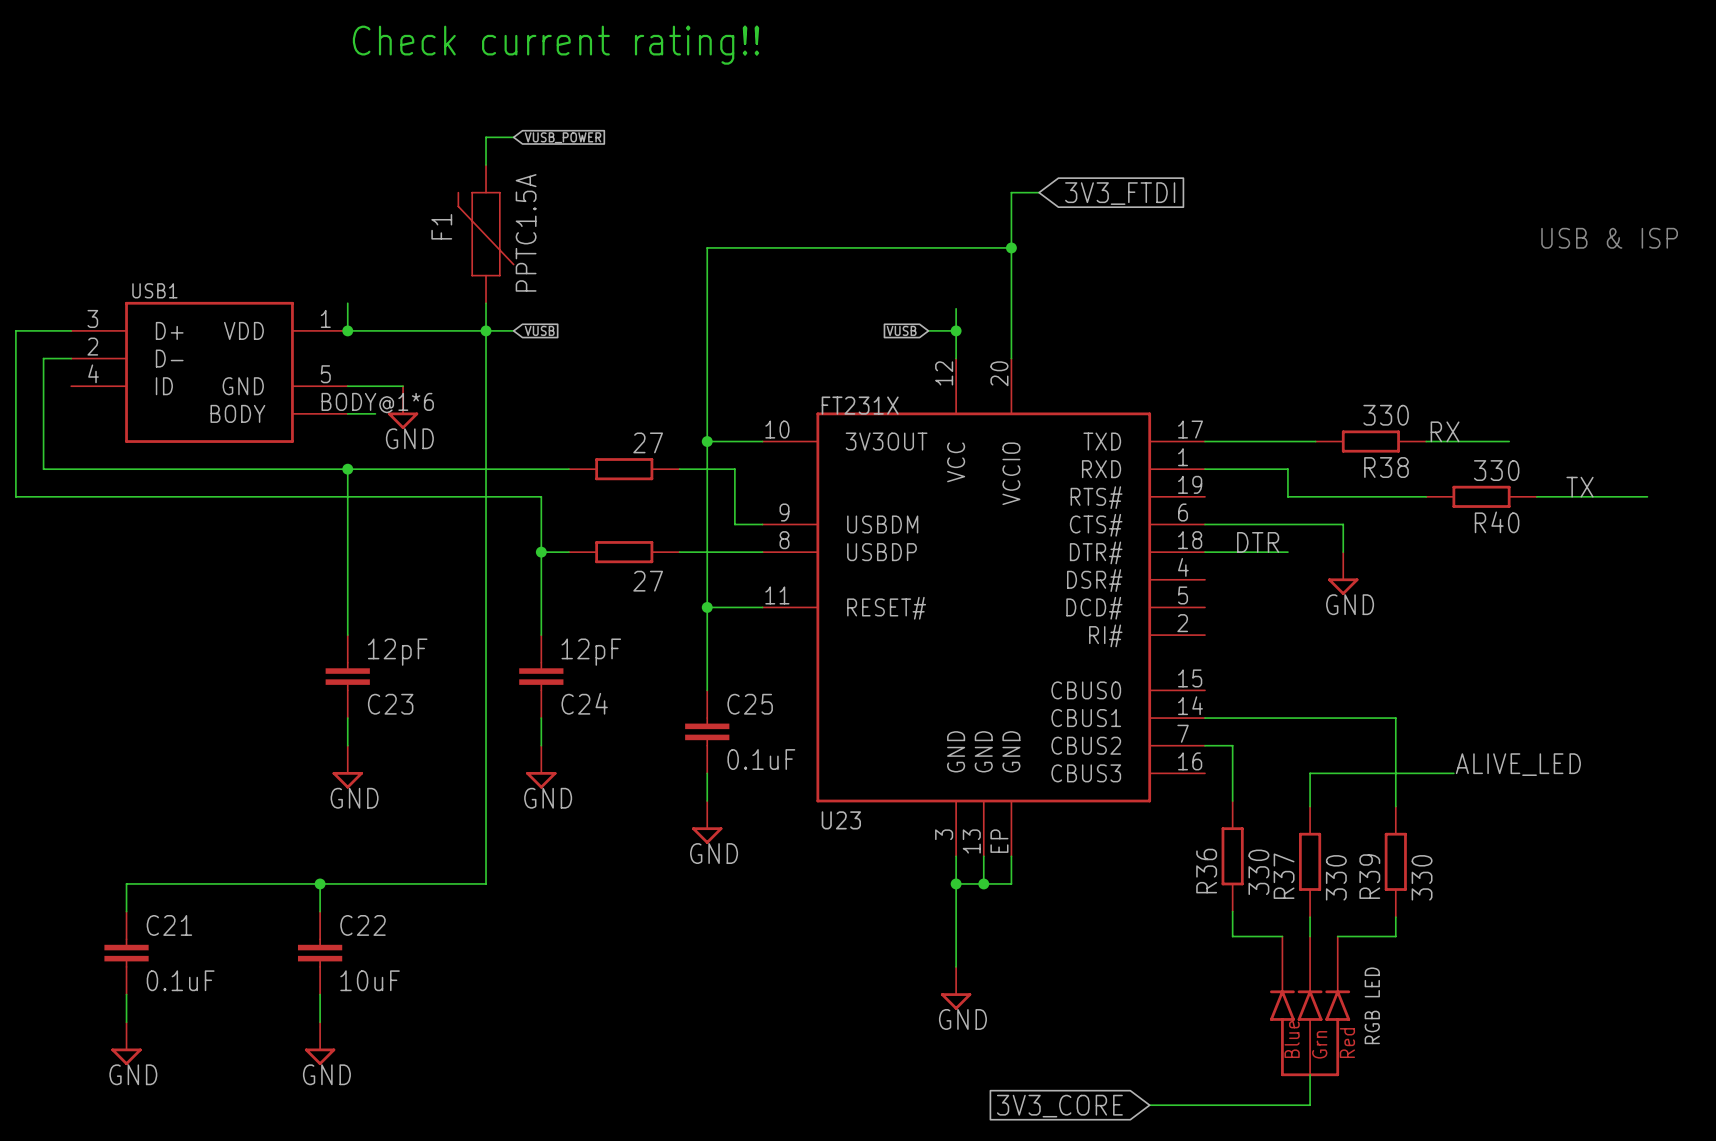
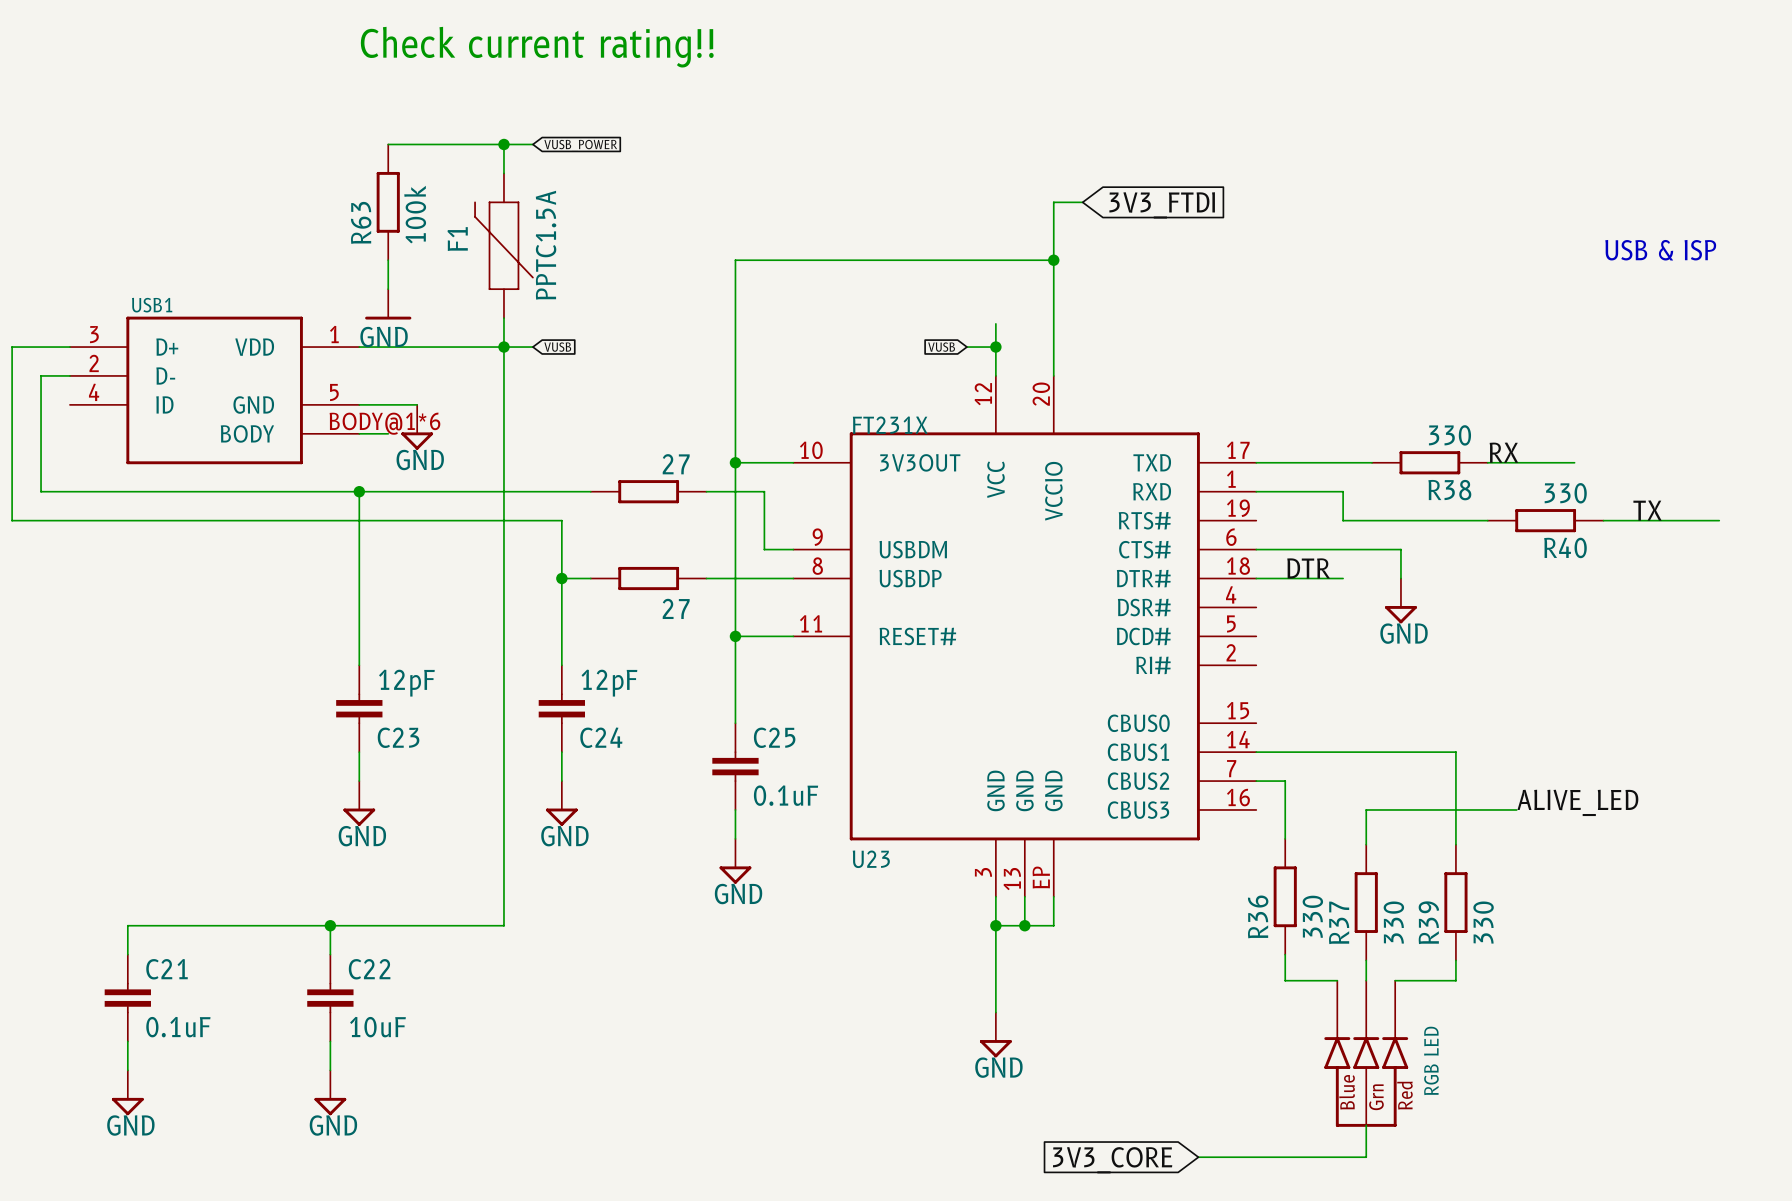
wire: none -> (388, 144) (503, 144)
junction: none -> (503, 144)
R63: none -> 100k (388, 202)
power symbol: none -> GND (388, 304)
wire: (347, 303) (347, 330) -> (388, 260) (388, 289)
junction: (347, 330) -> none

